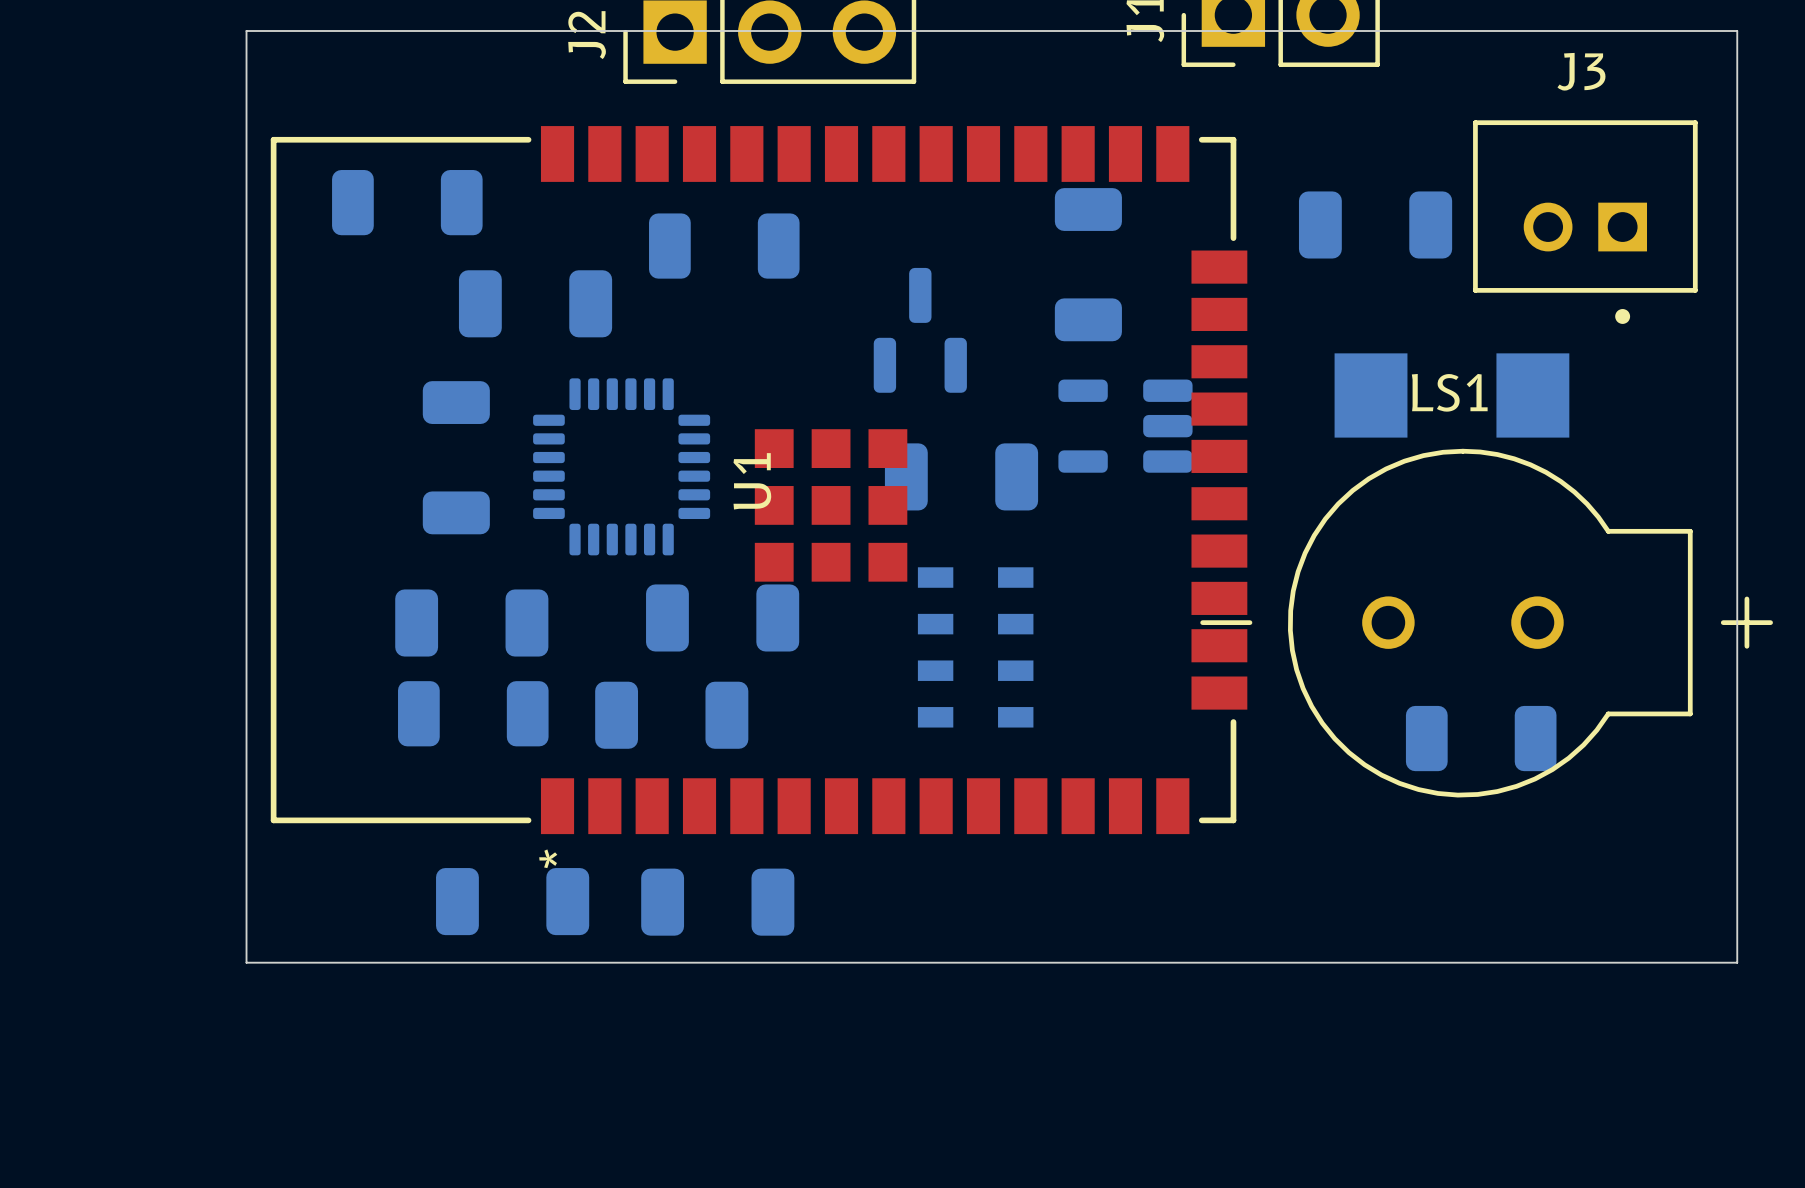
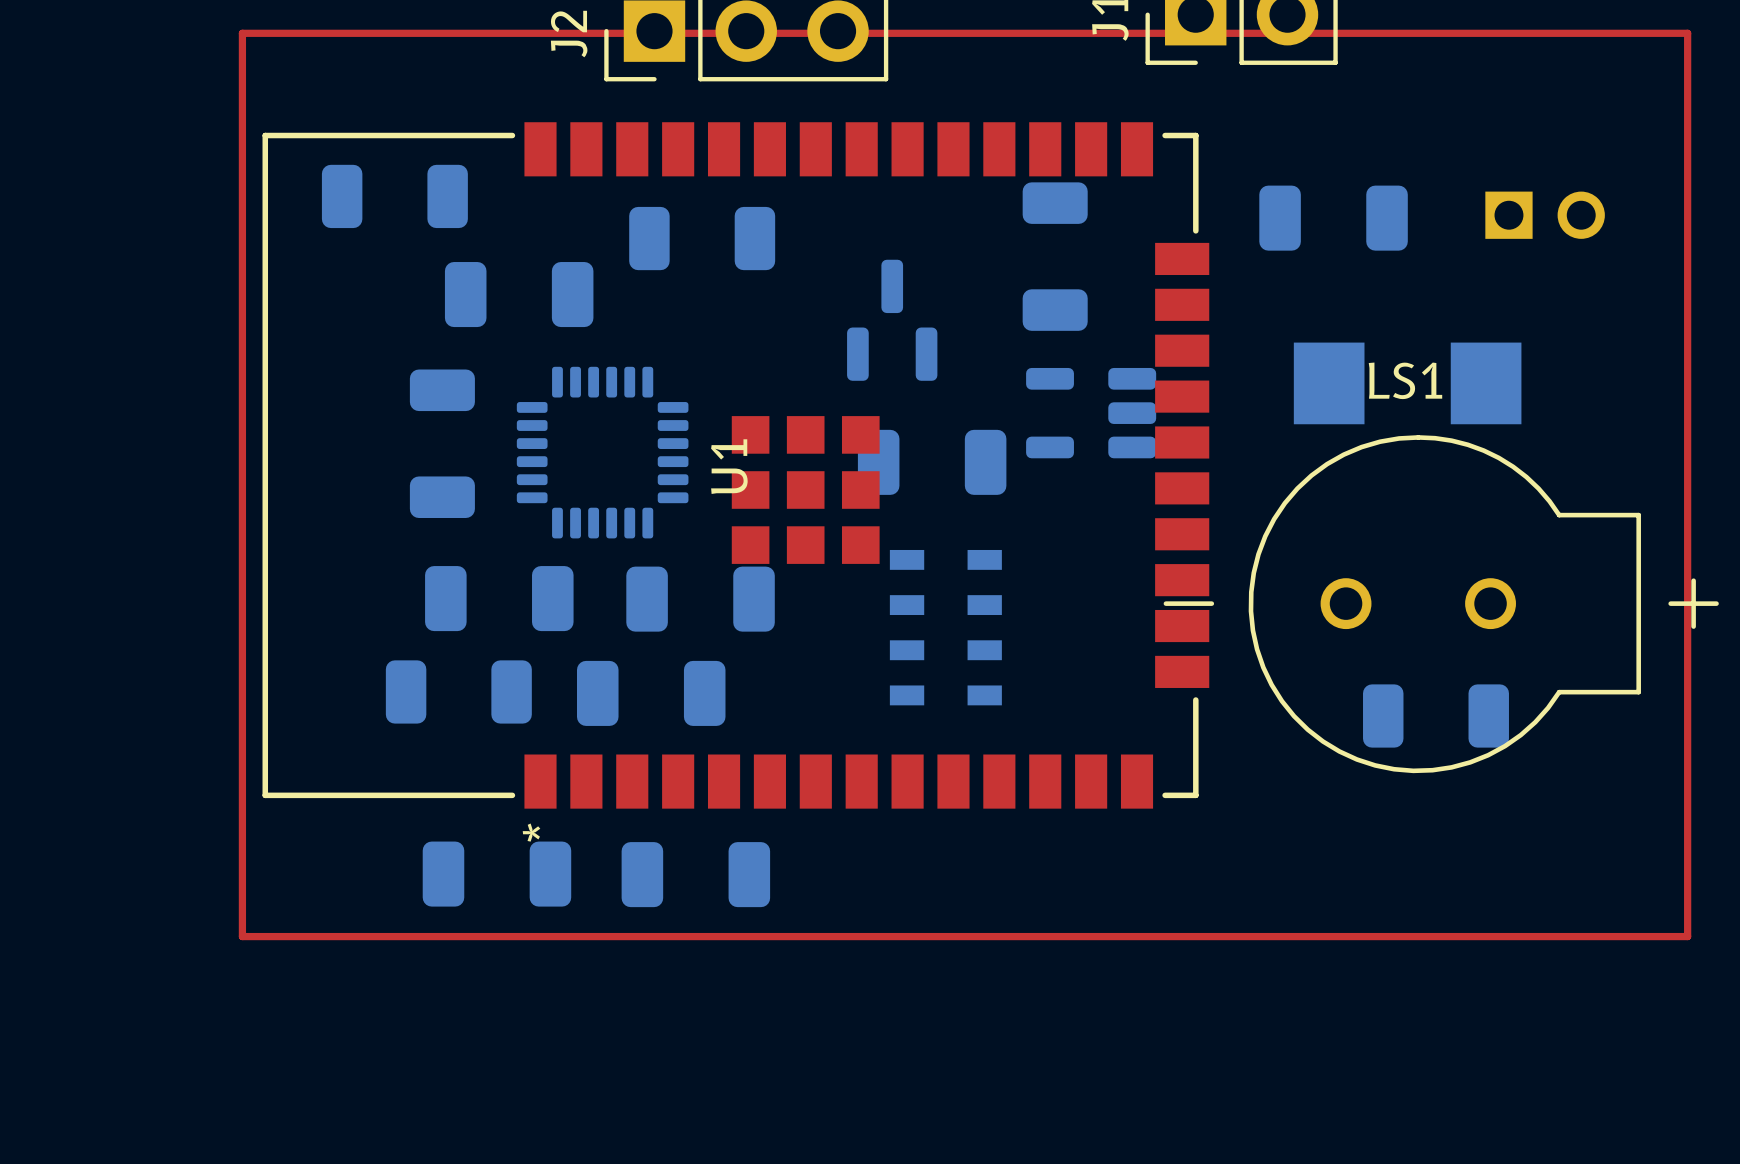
board edge: (246, 31) (1737, 31) (1737, 962) (246, 962) (246, 31) -> none
top track: none -> (242, 33) (1687, 33) (1687, 936) (242, 936) (242, 33)
J3 side: top (1585, 222) -> bottom (1545, 215)
part position: (471, 623) -> (499, 598)

